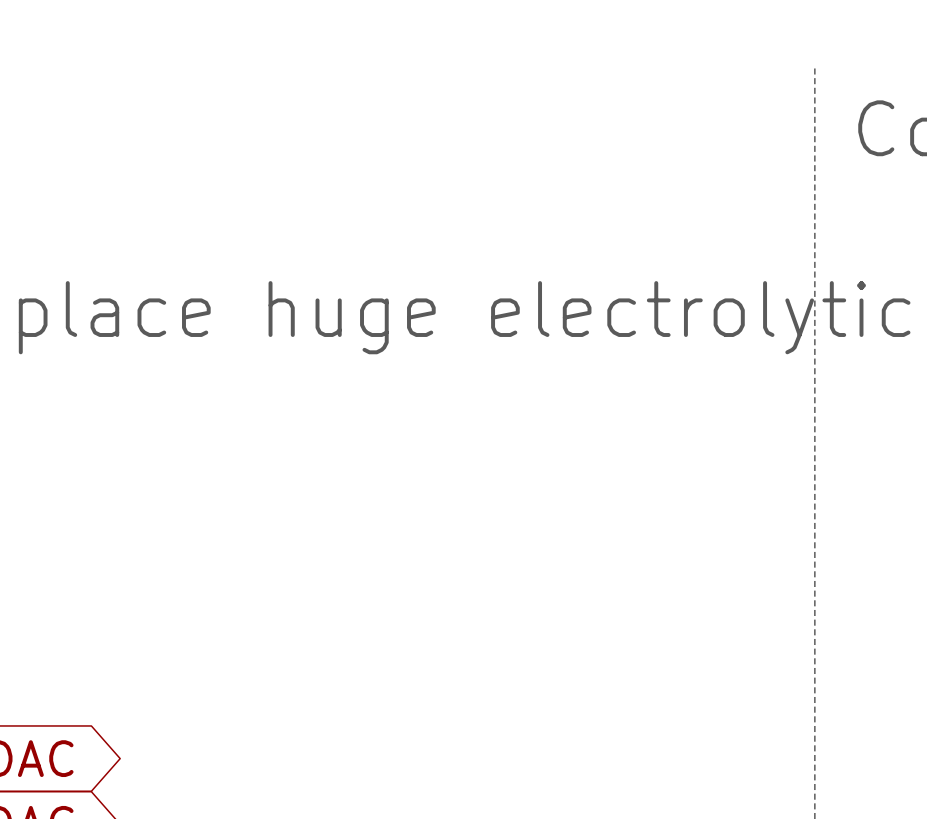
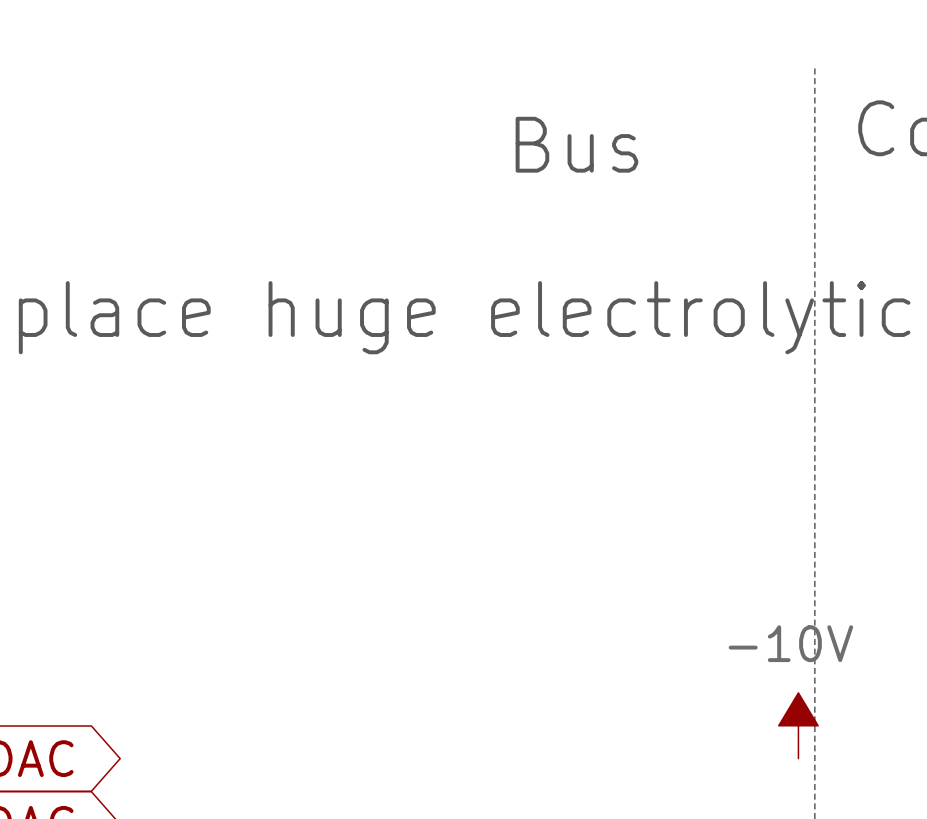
text: none -> Bus (576, 144)
power symbol: none -> -10V (798, 725)

